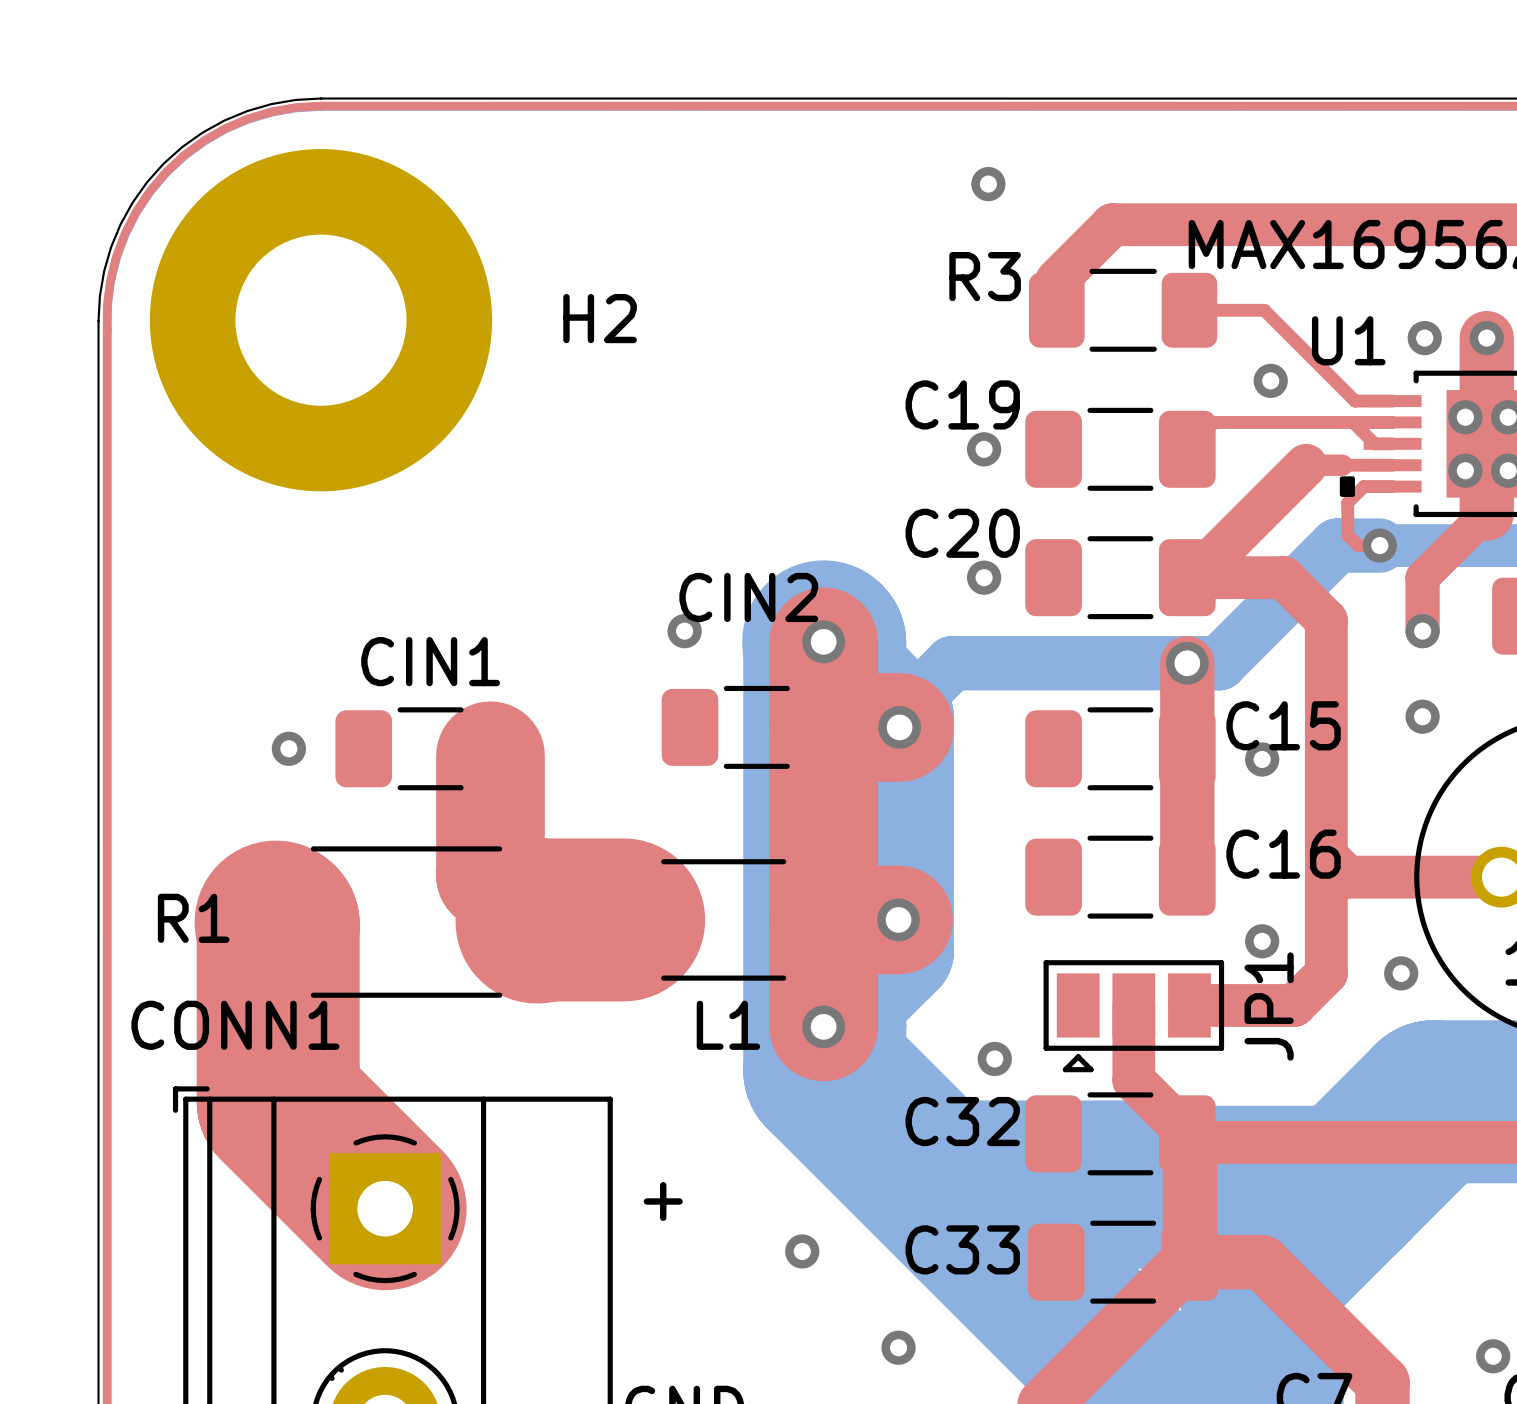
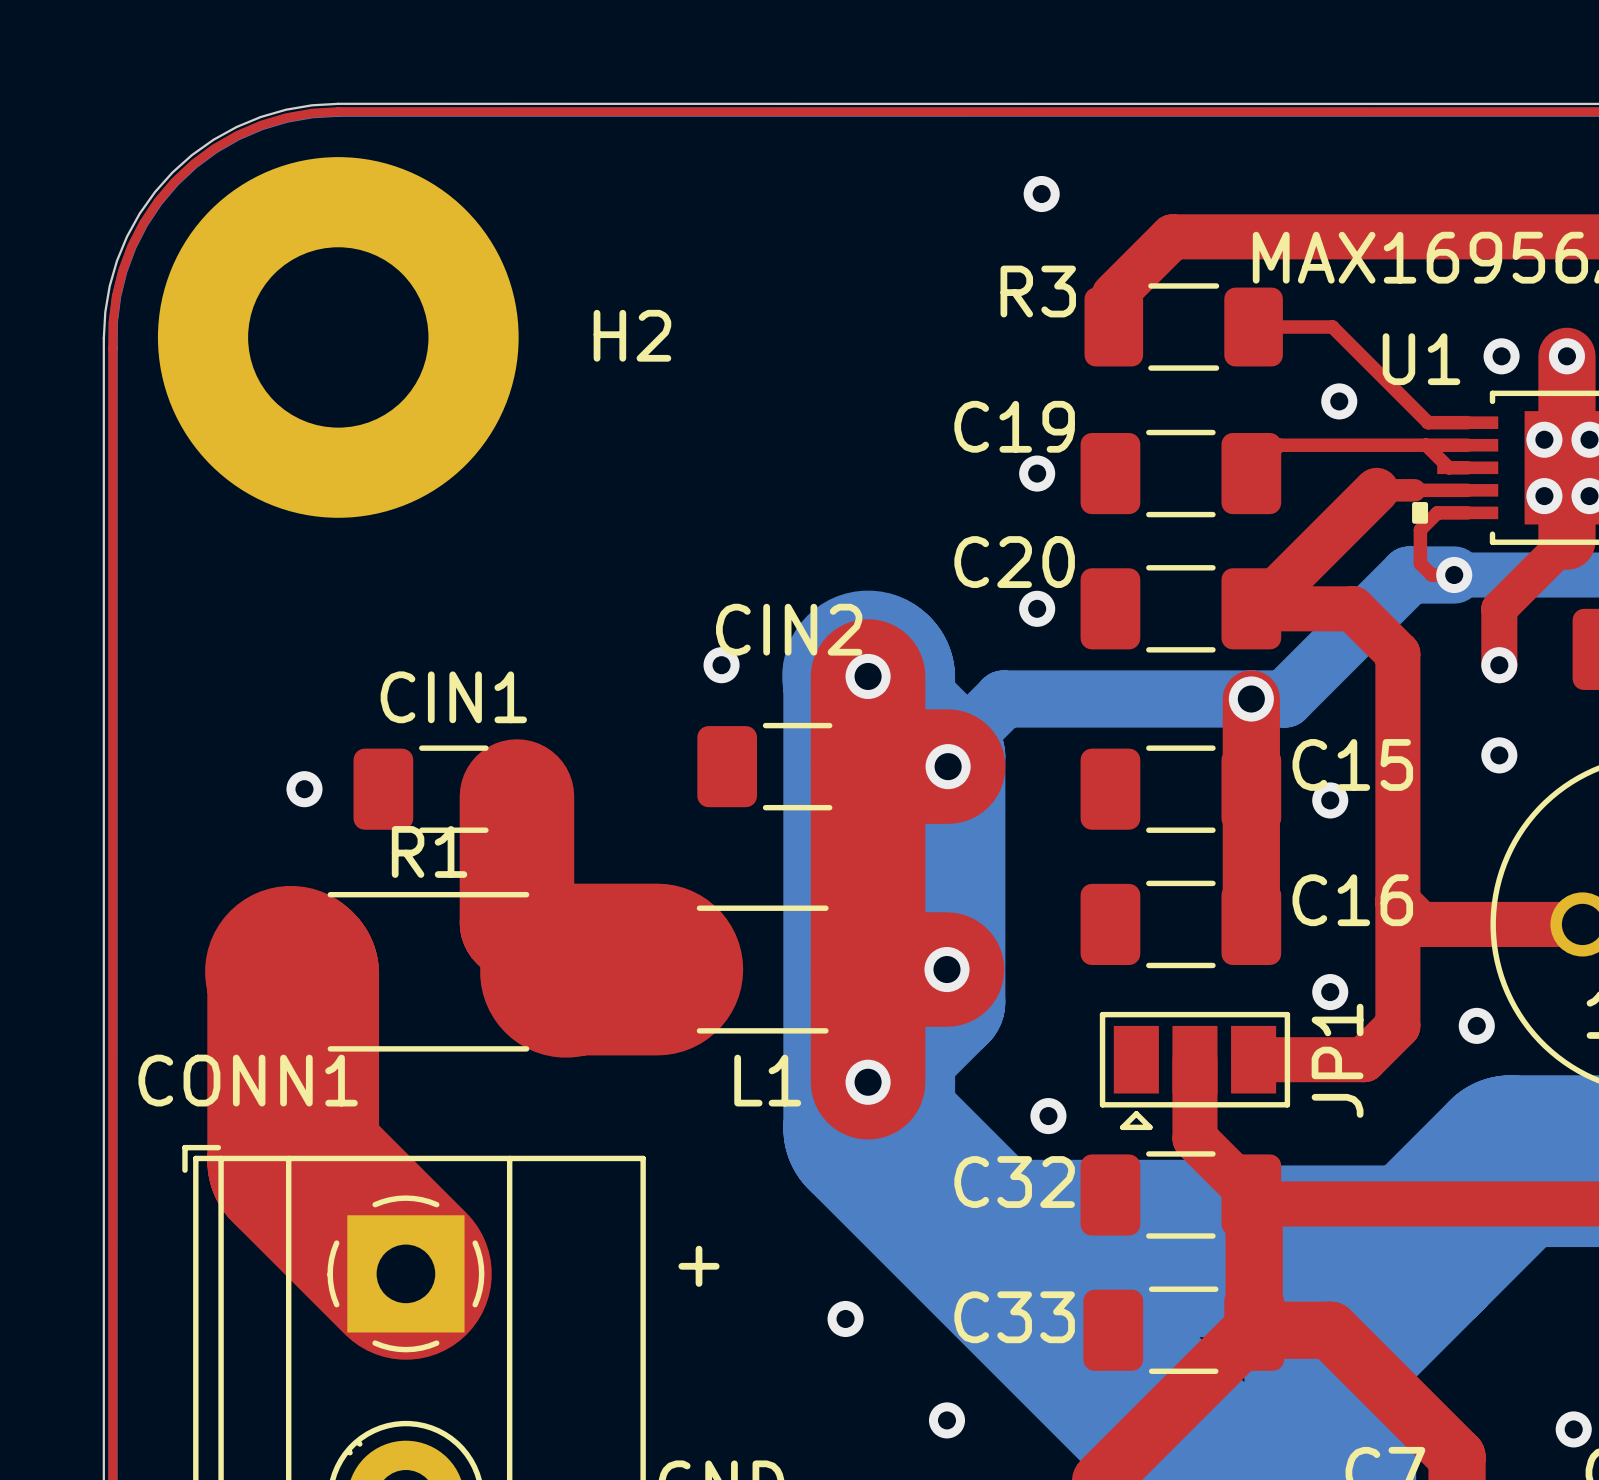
R1 name position: R1 (193, 918) -> R1 (429, 851)

